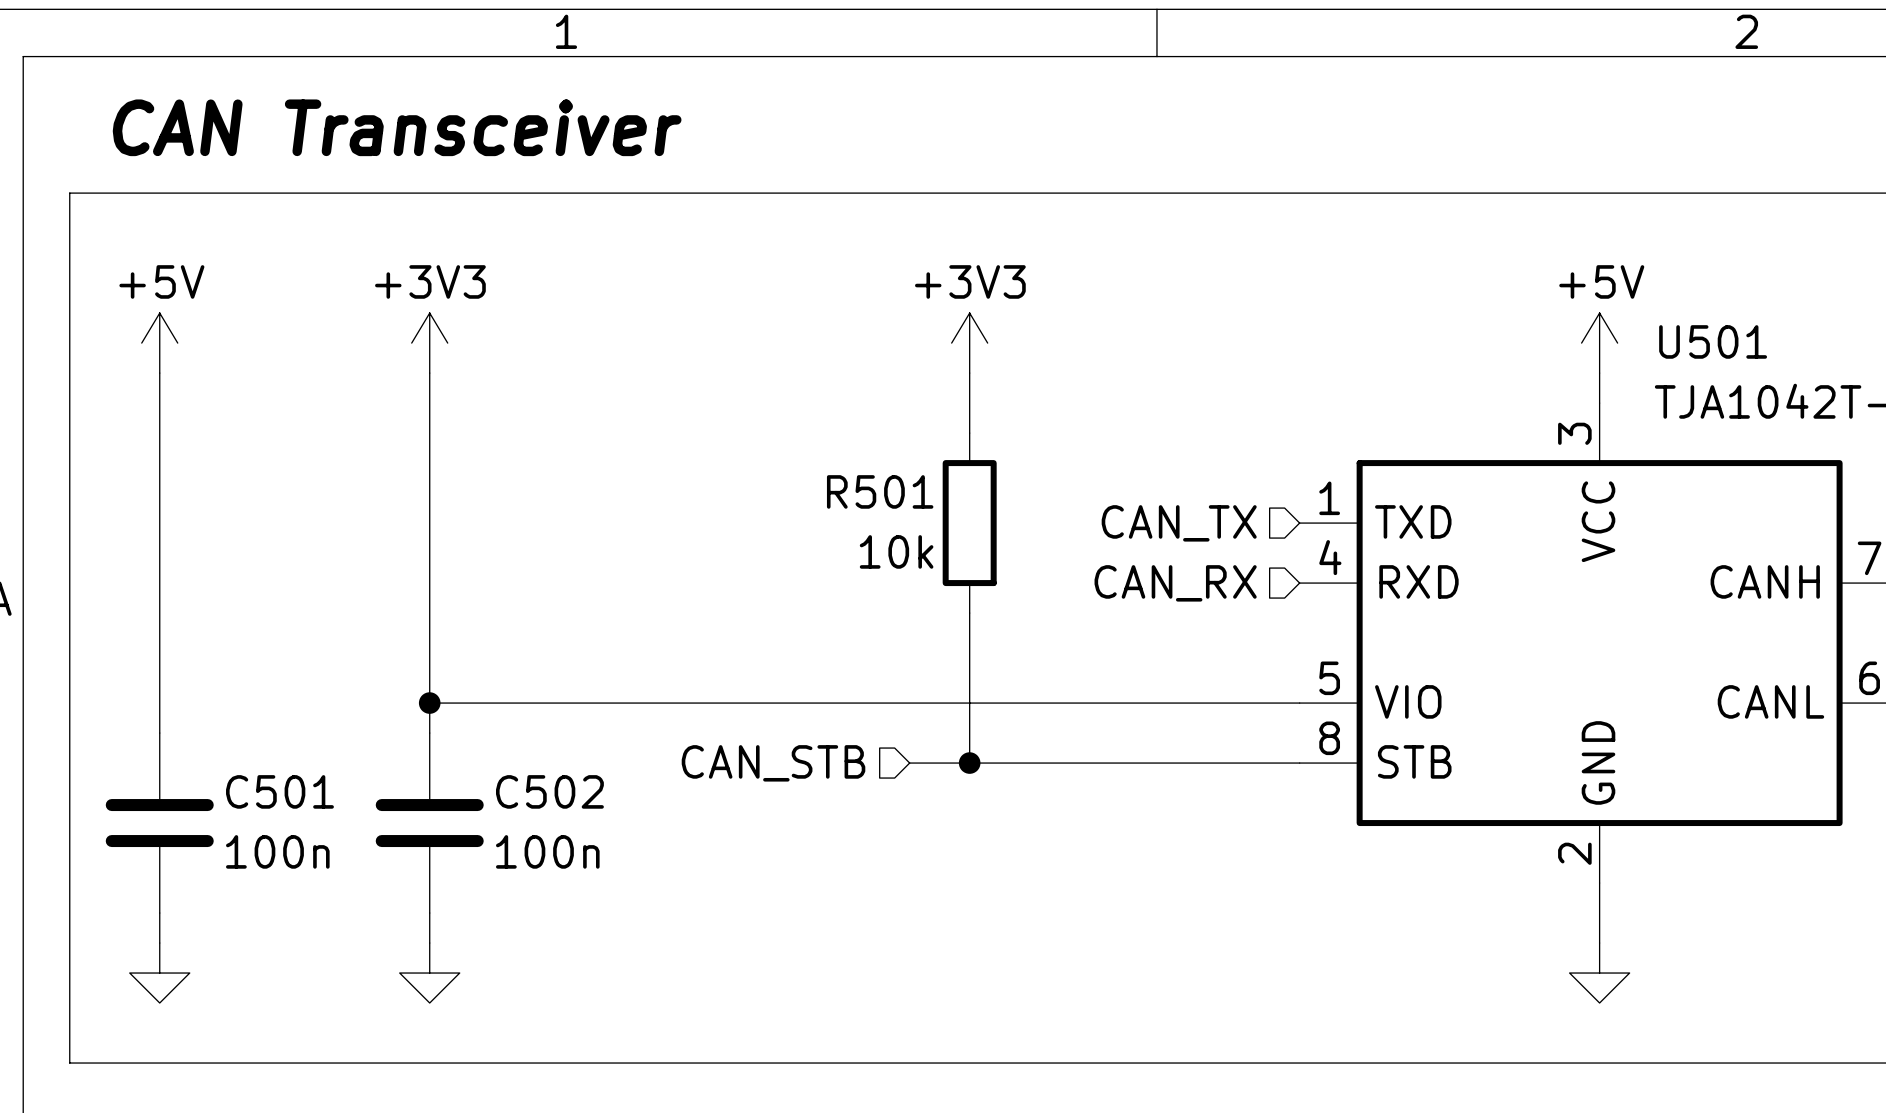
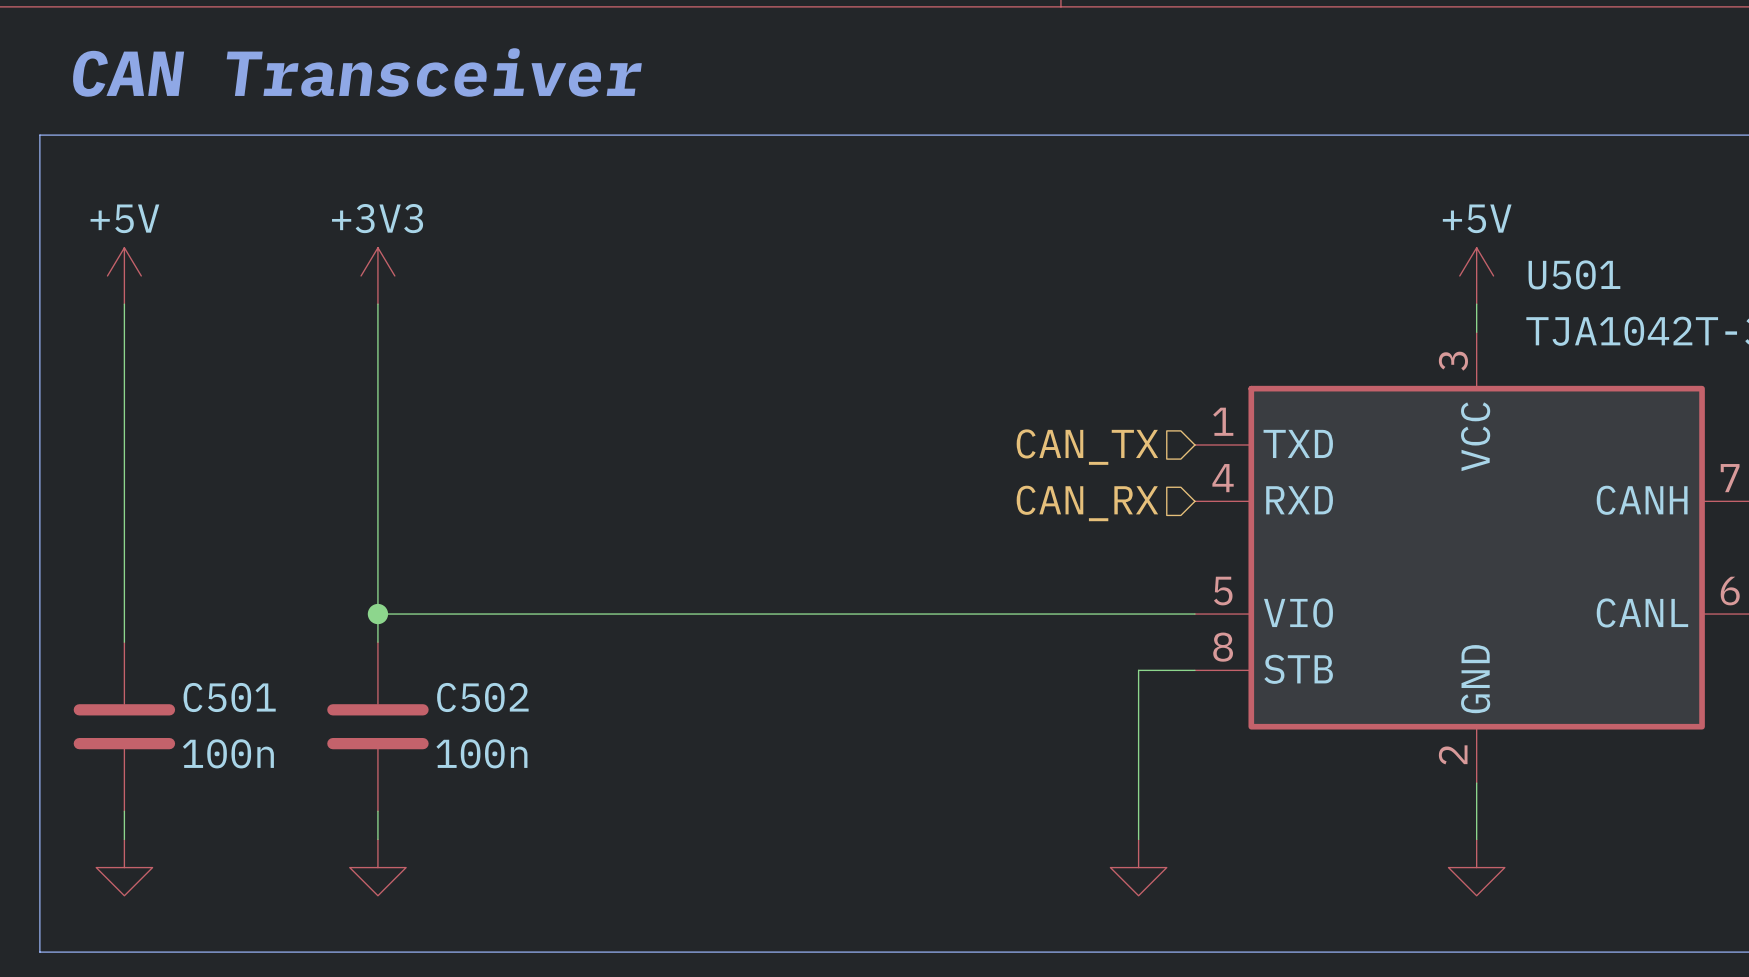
power symbol: +3V3 (969, 343) -> none
wire: (969, 373) (969, 433) -> none
R501: 10k (969, 523) -> none
wire: (969, 613) (969, 763) -> none
hierarchical label: CAN_STB (773, 763) -> none
wire: (909, 763) (1239, 763) -> (1138, 839) (1138, 670)
junction: (969, 763) -> none
power symbol: none -> (1138, 867)

